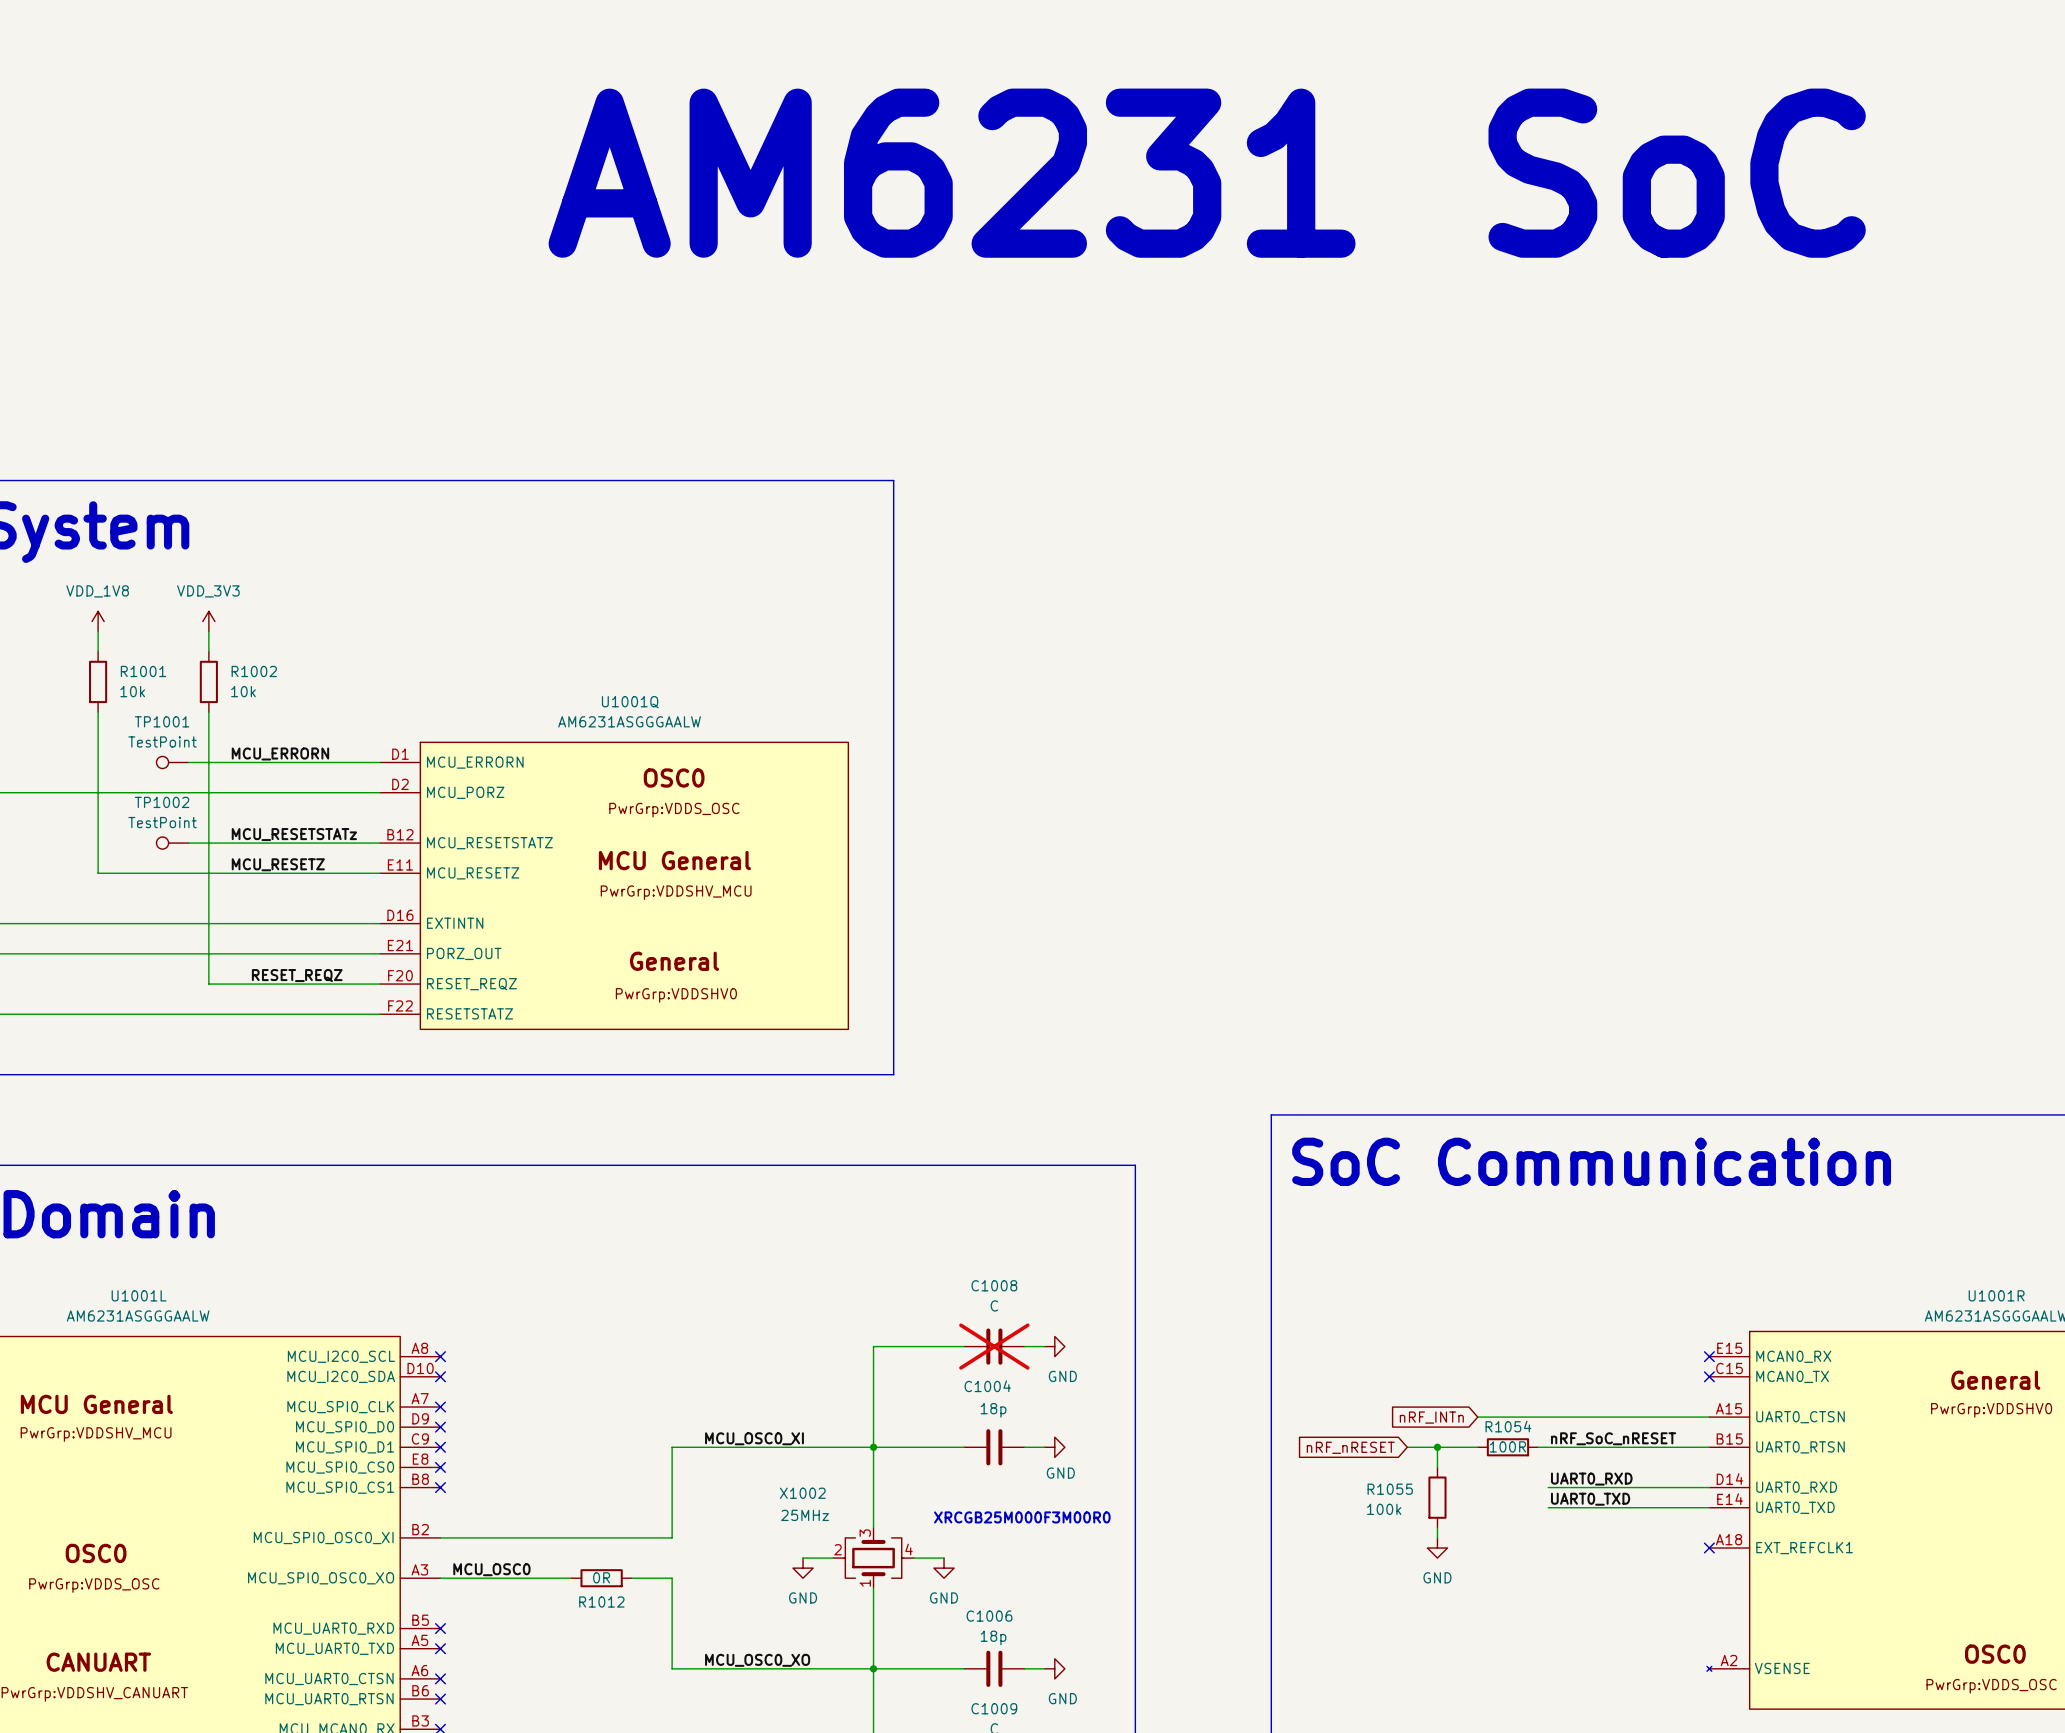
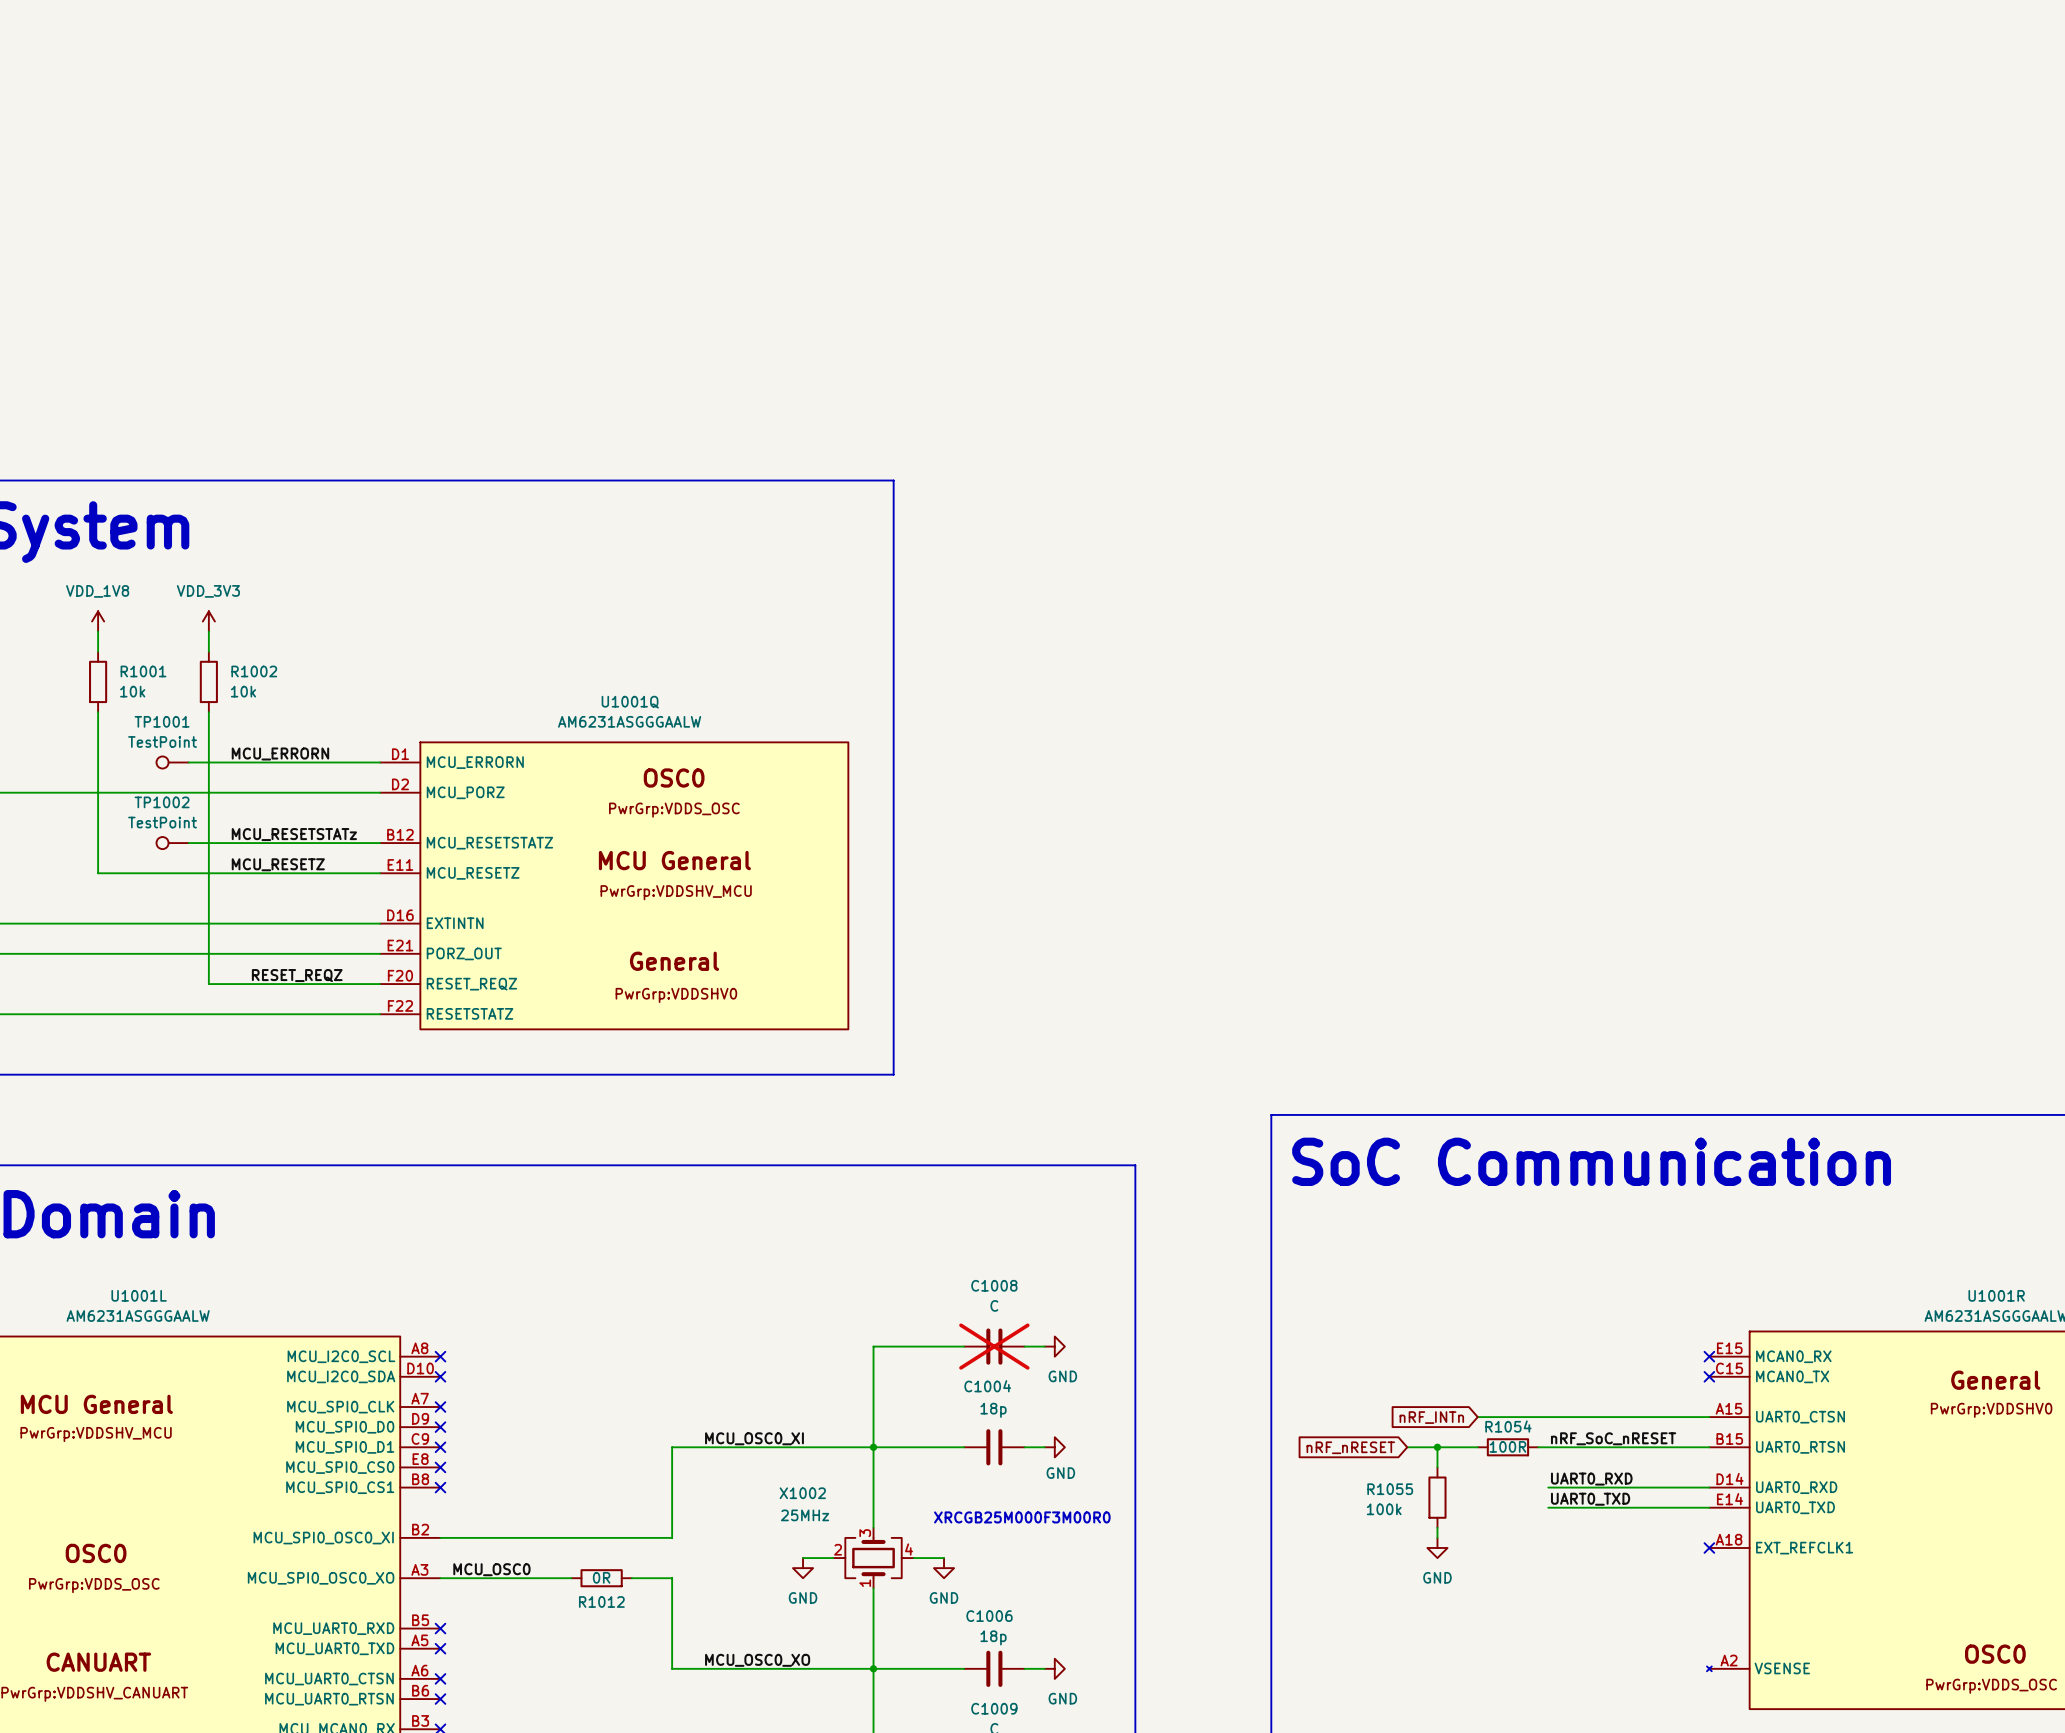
text: AM6231 SoC (1207, 173) -> none

